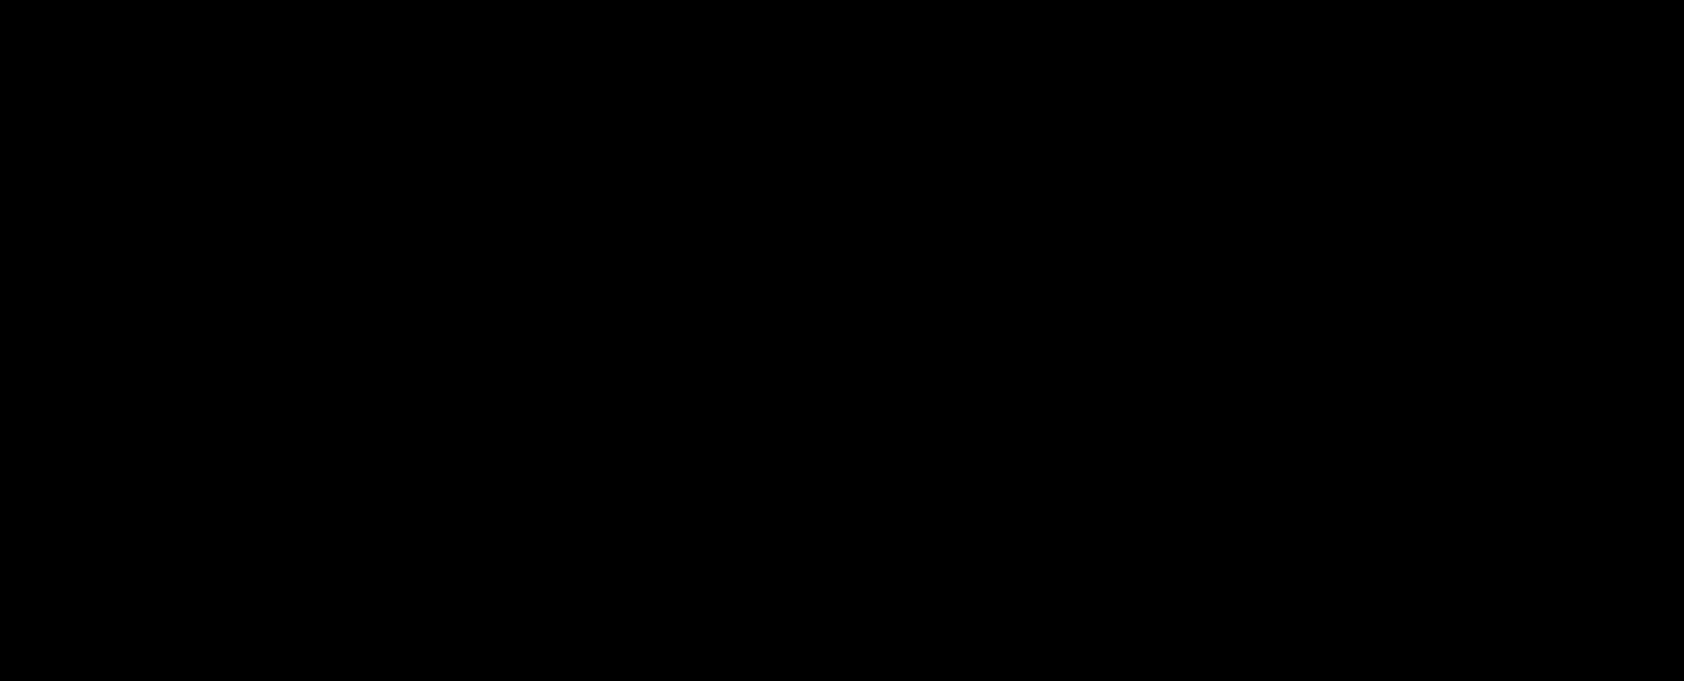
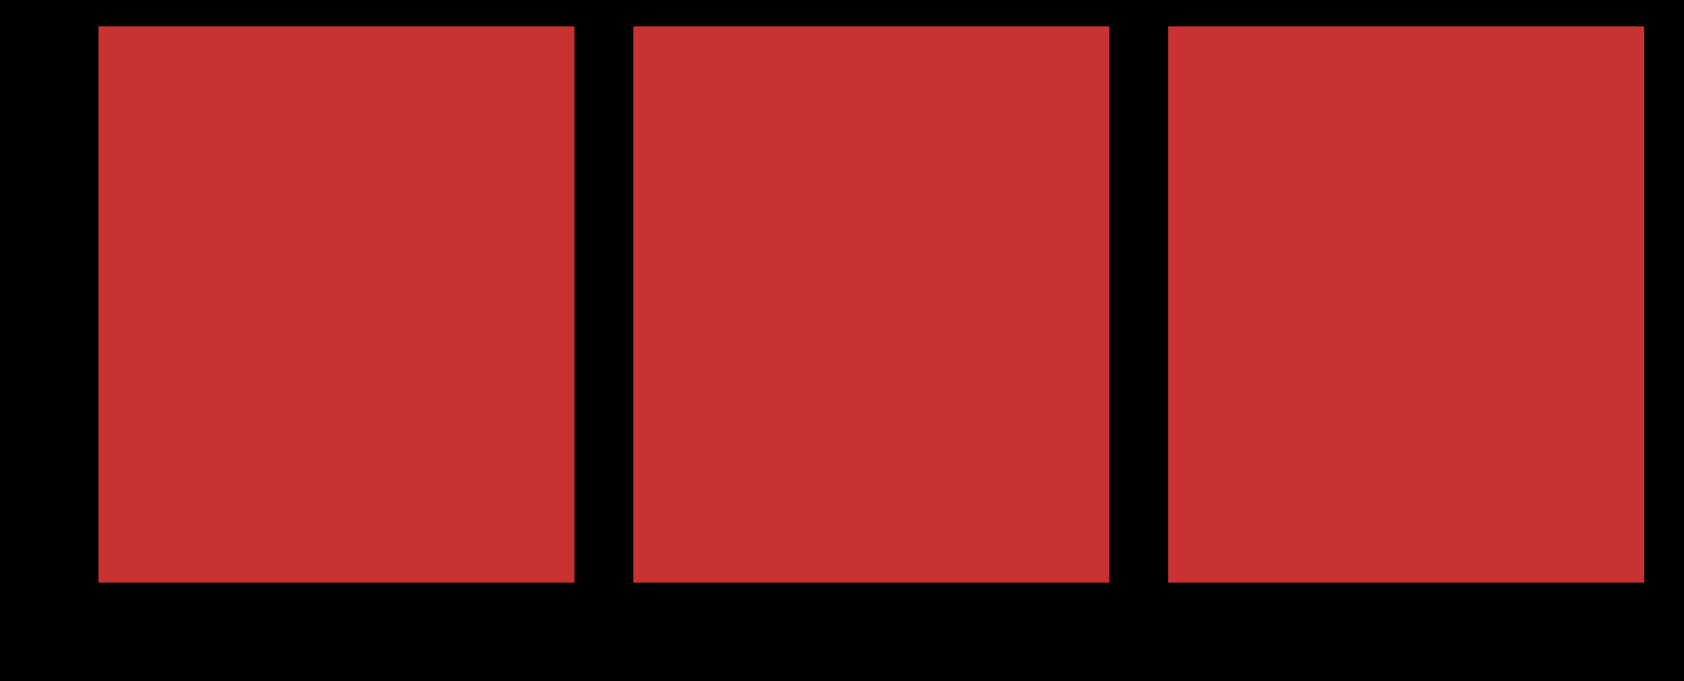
part: none -> (336, 304)
part: none -> (871, 304)
part: none -> (1406, 304)

